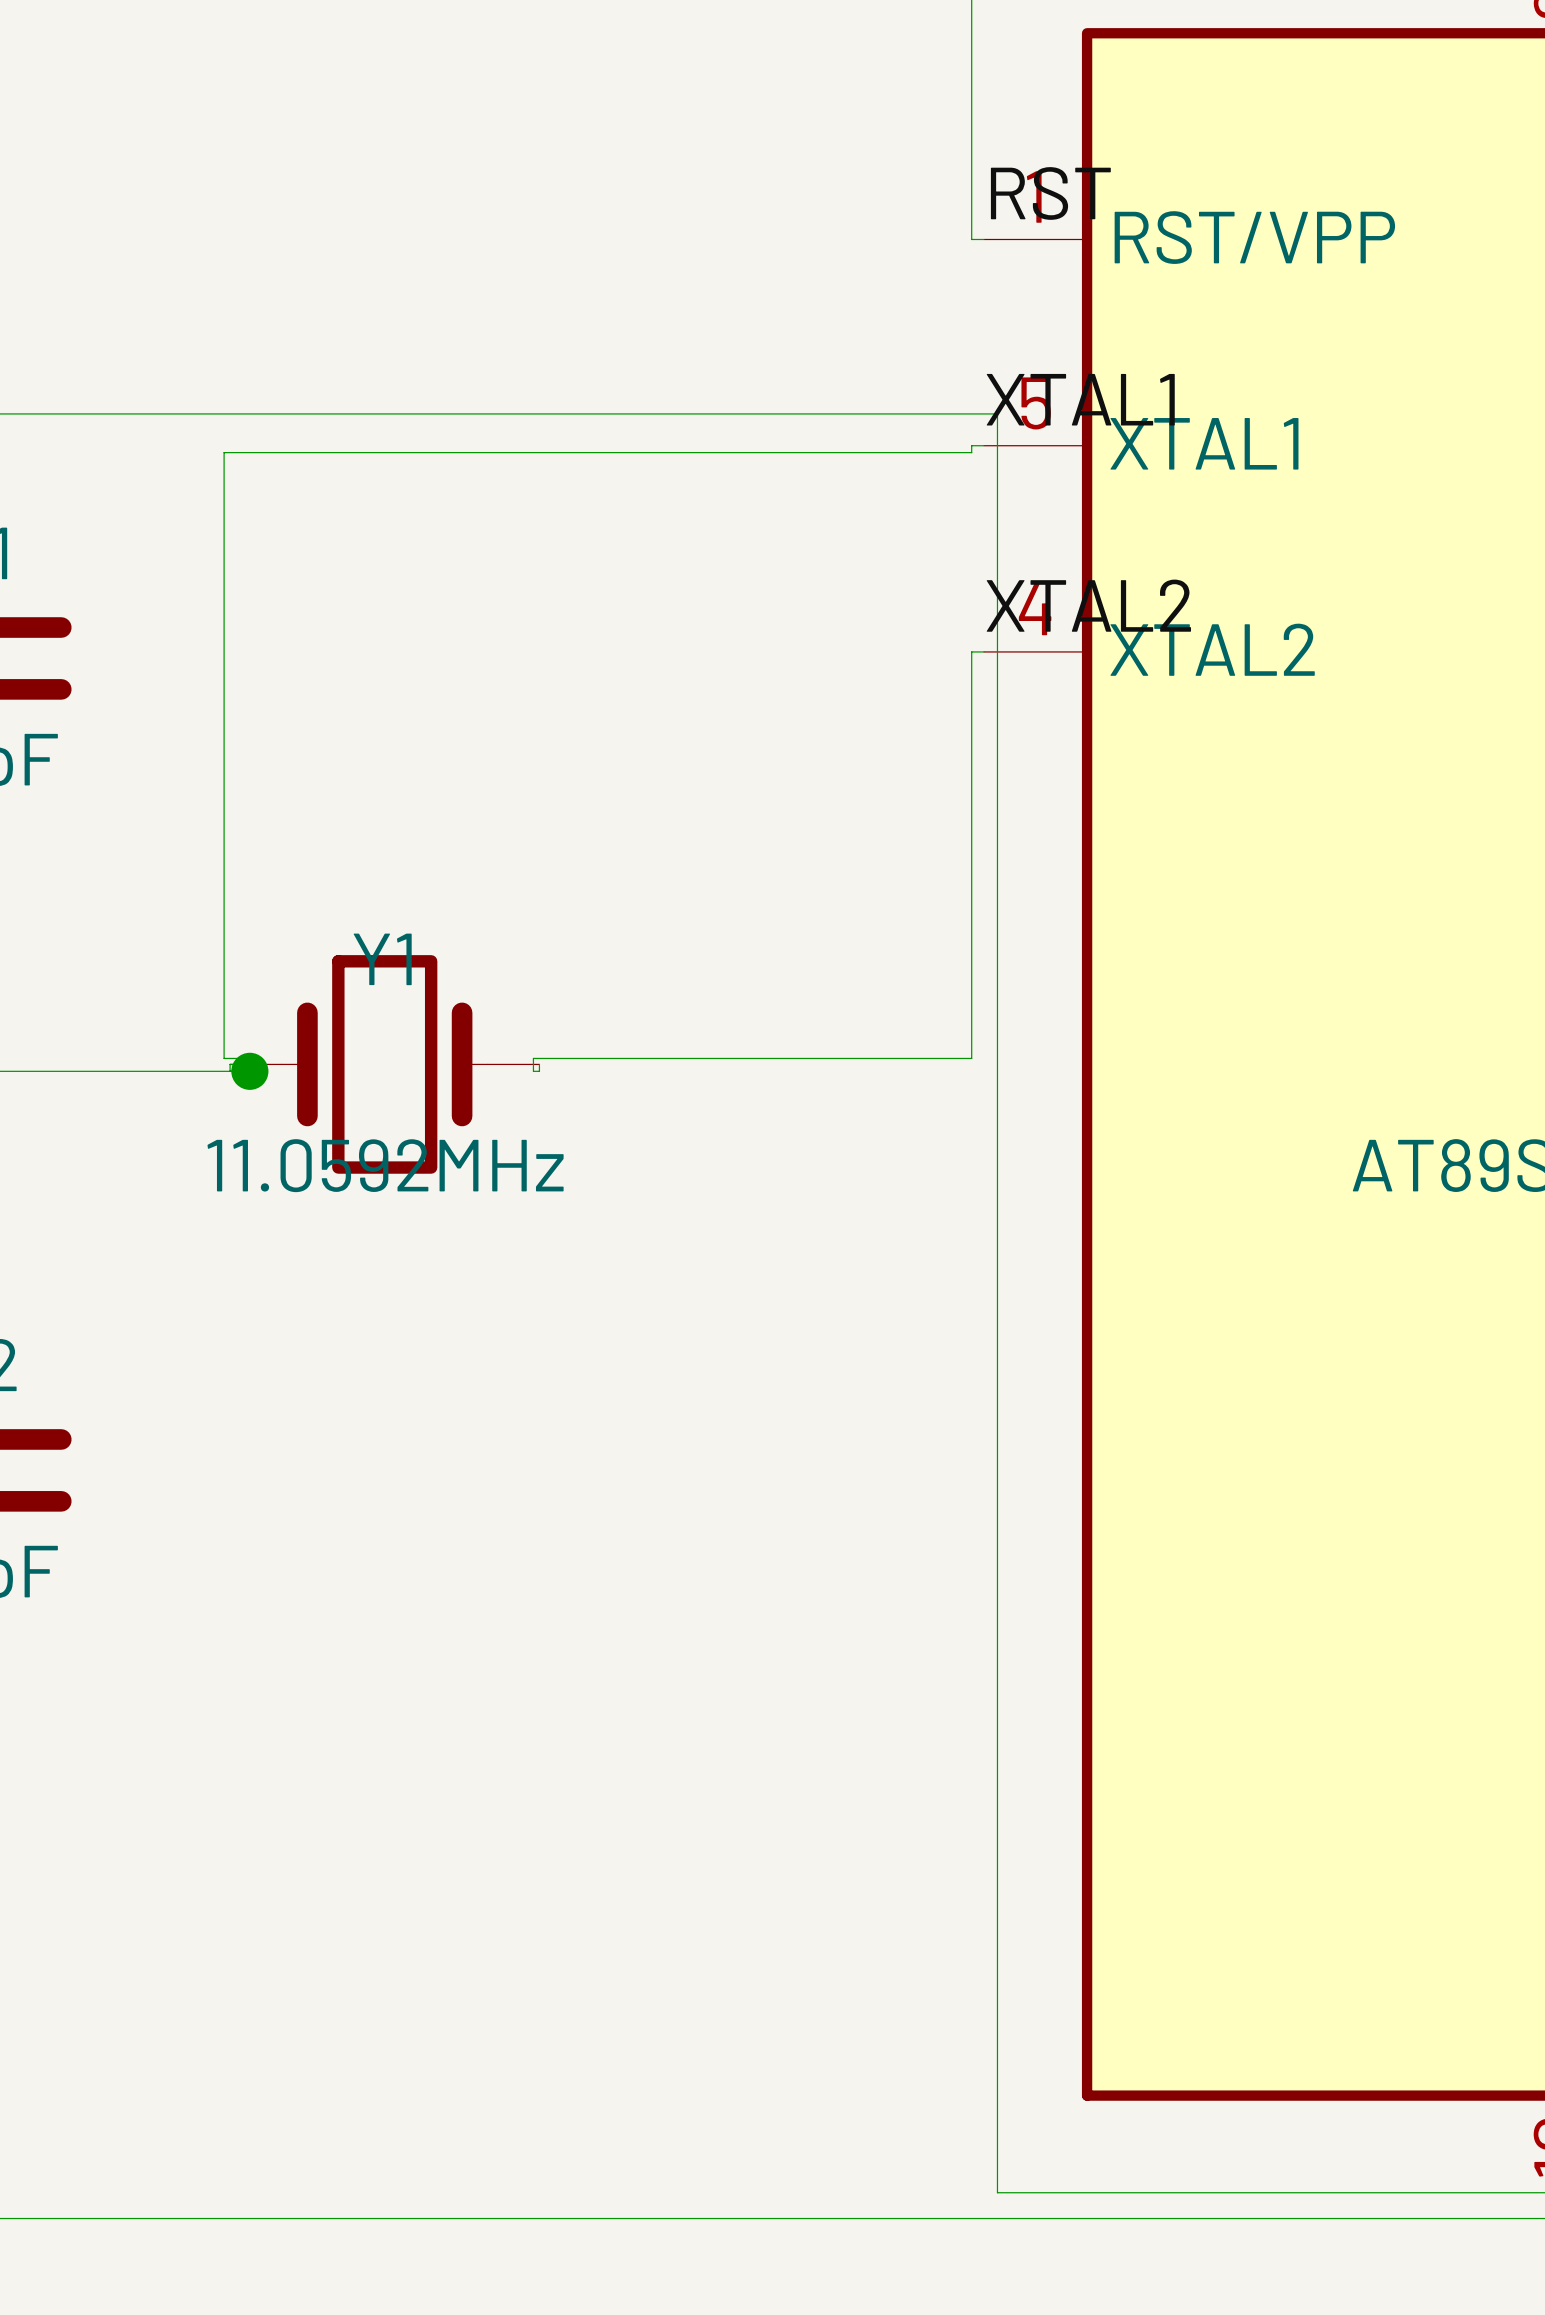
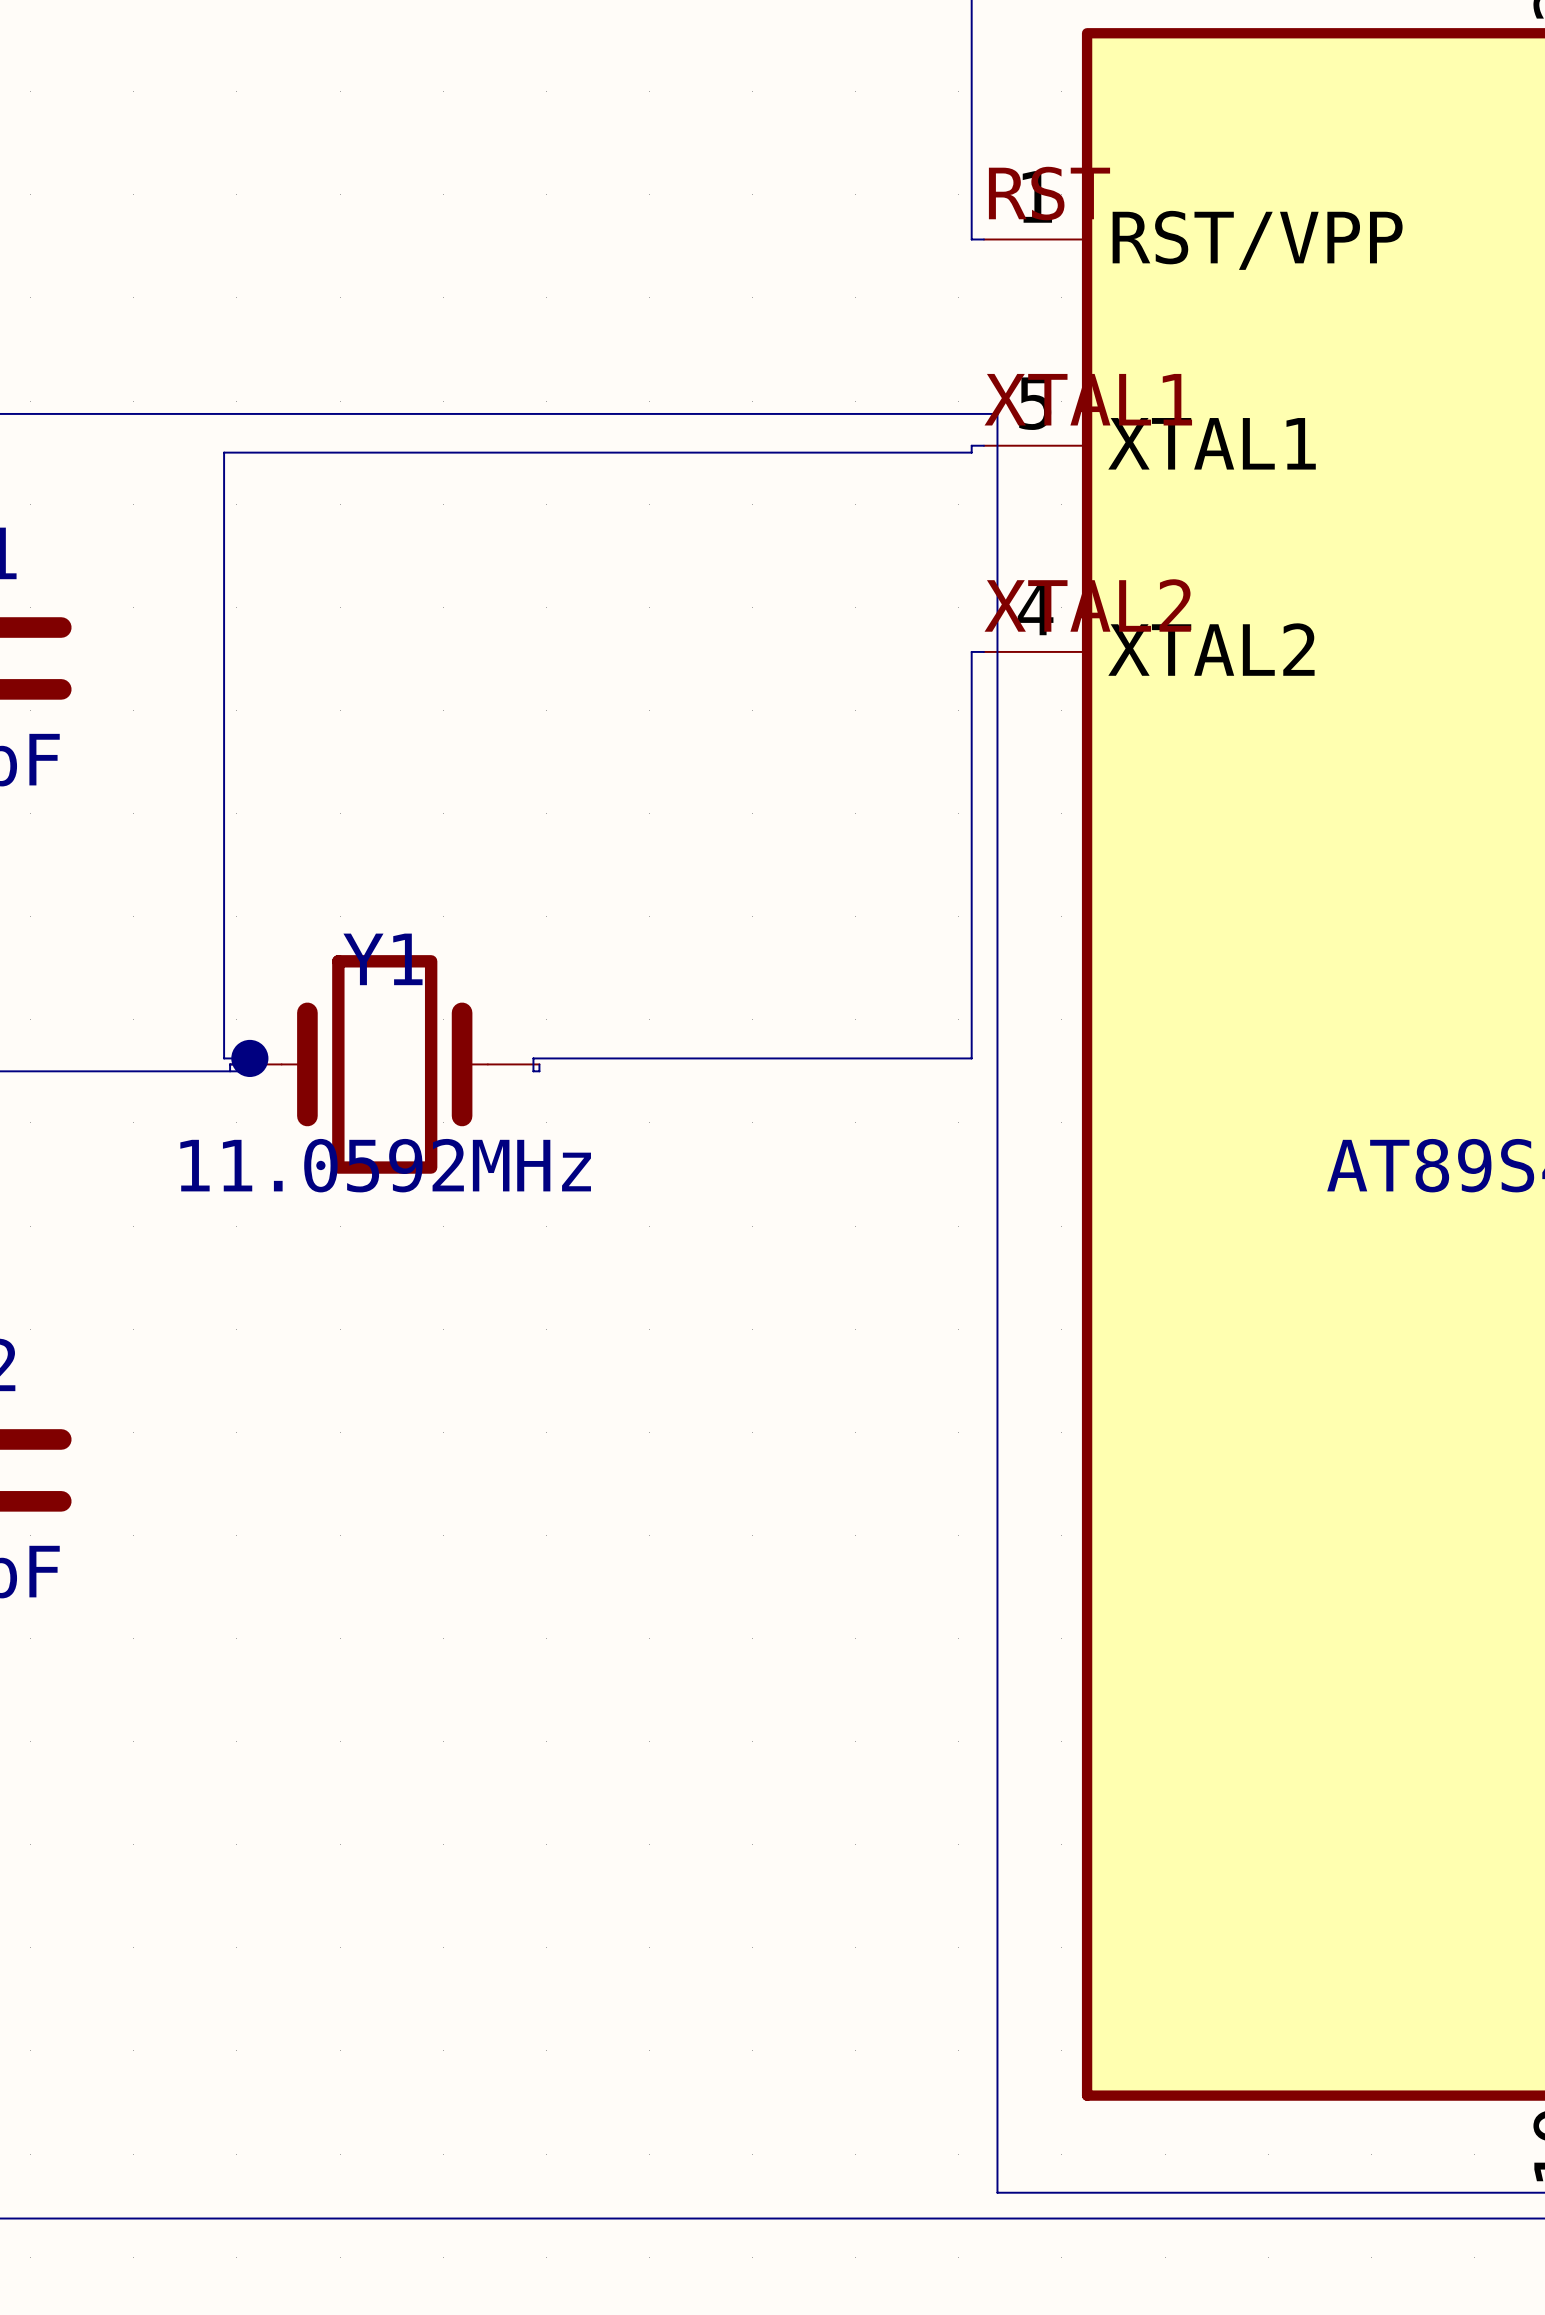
junction position: (249, 1071) -> (249, 1058)

